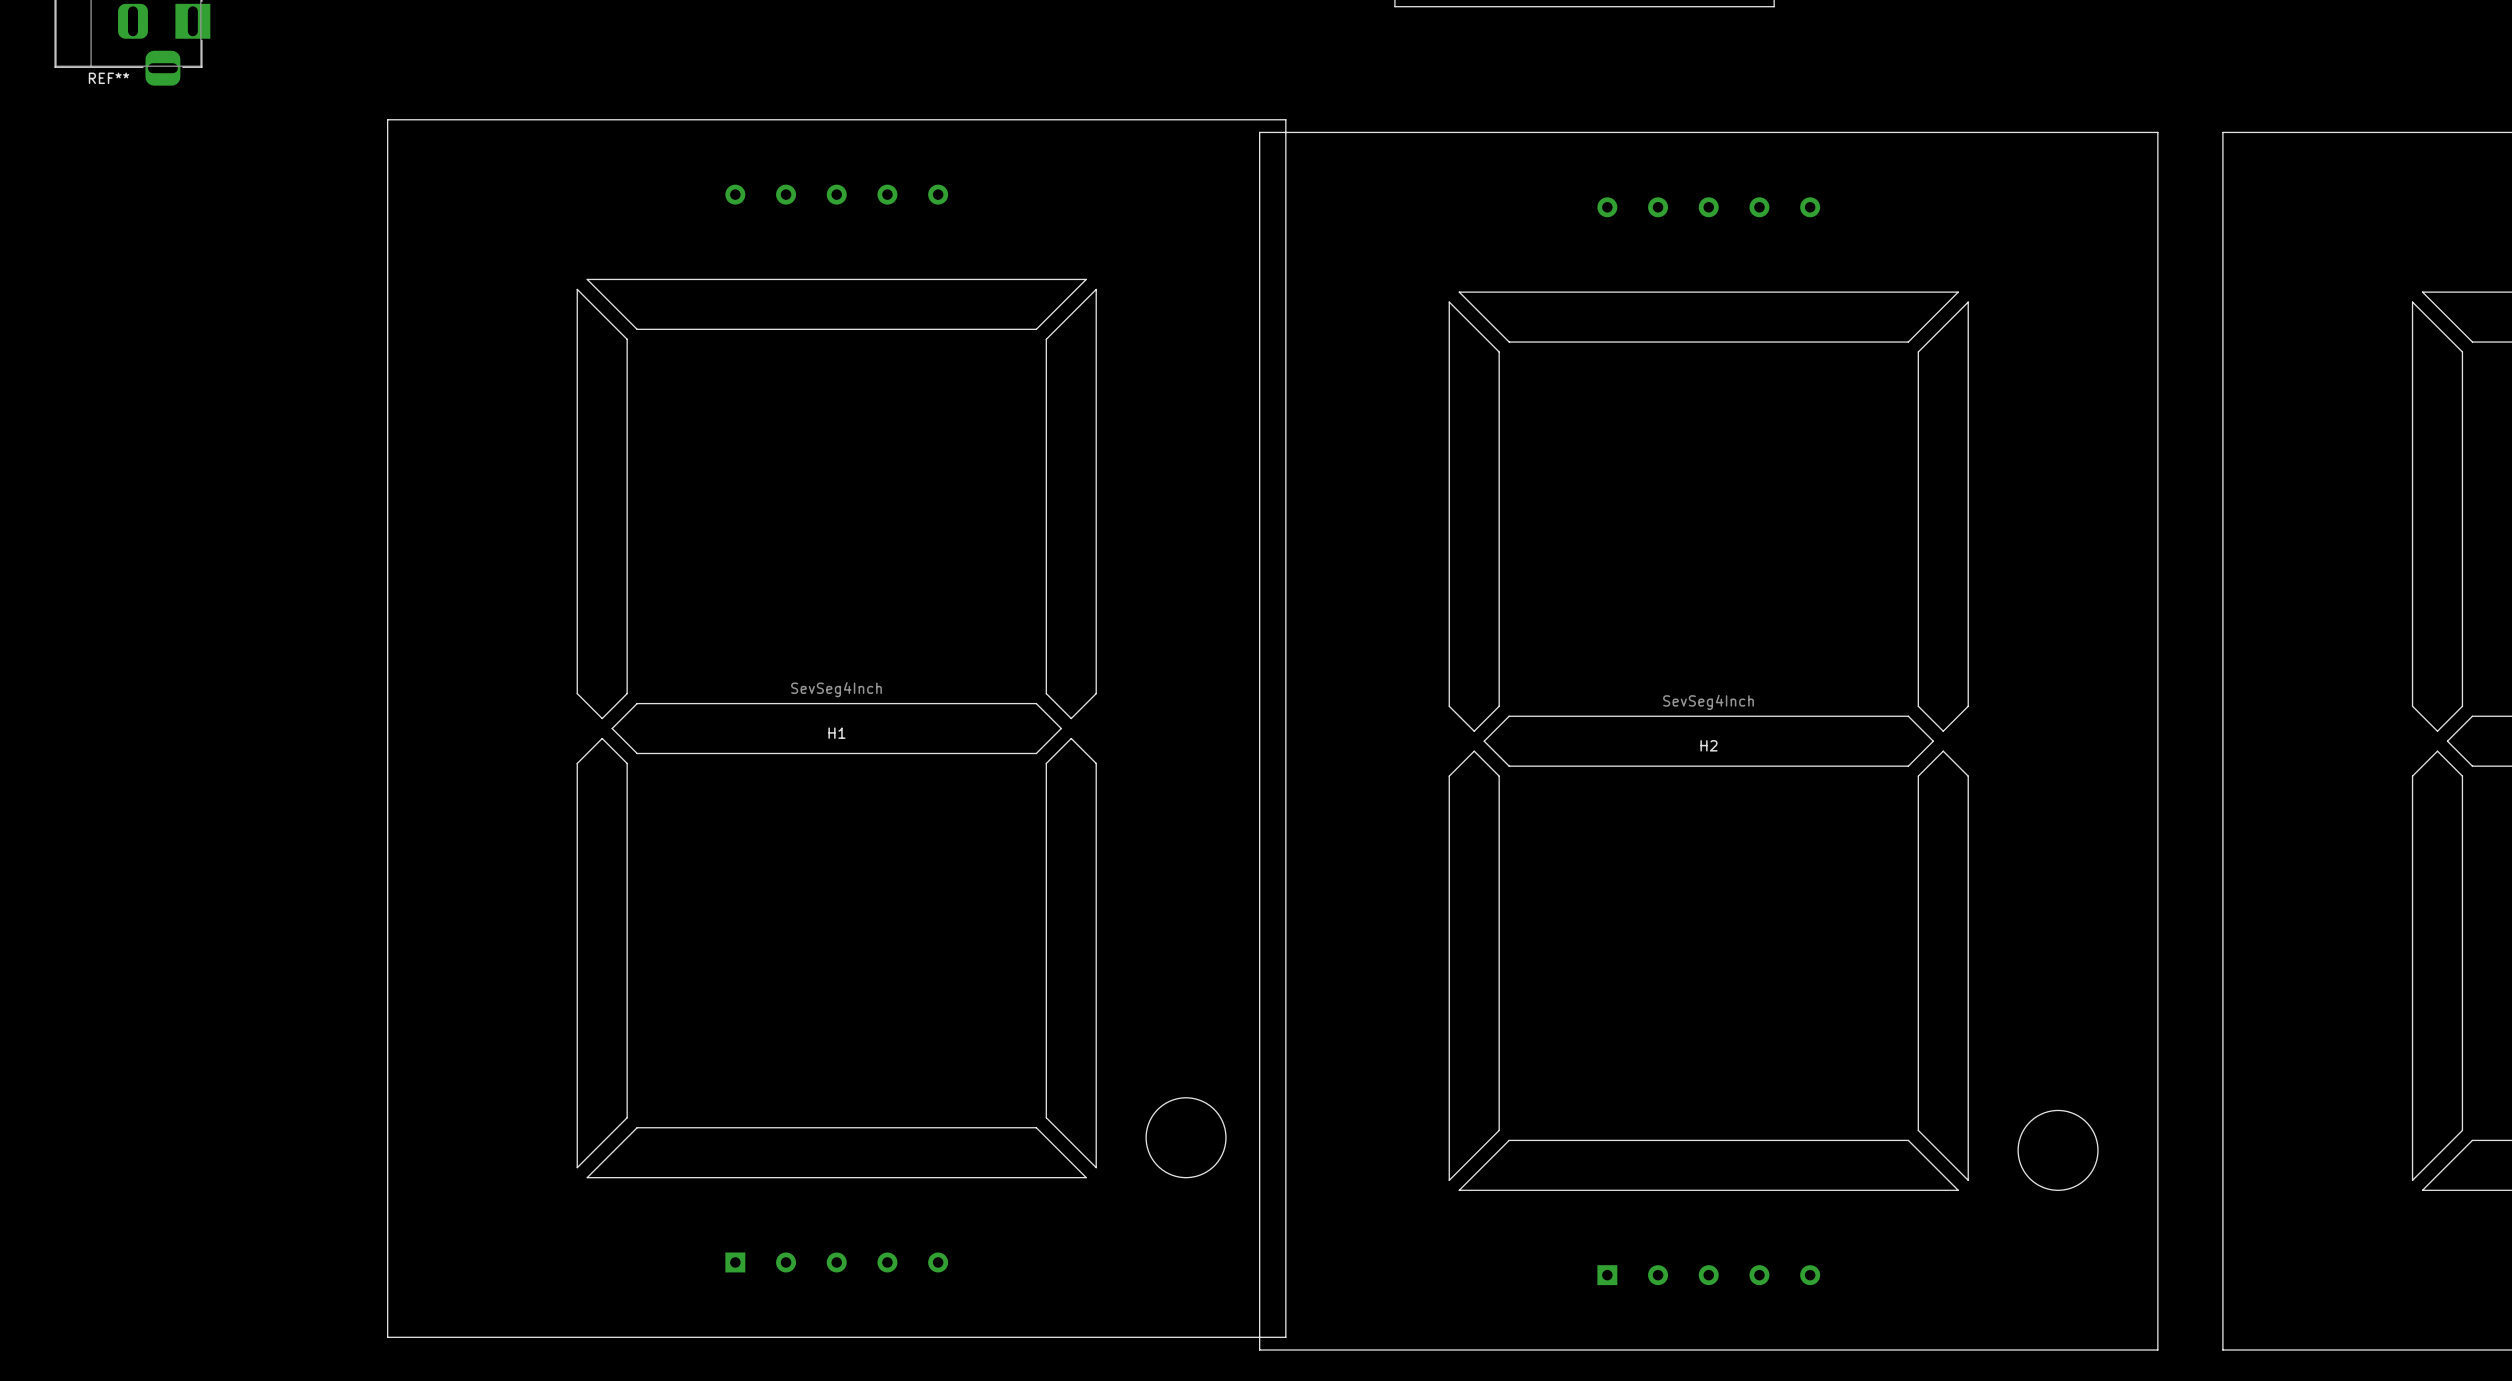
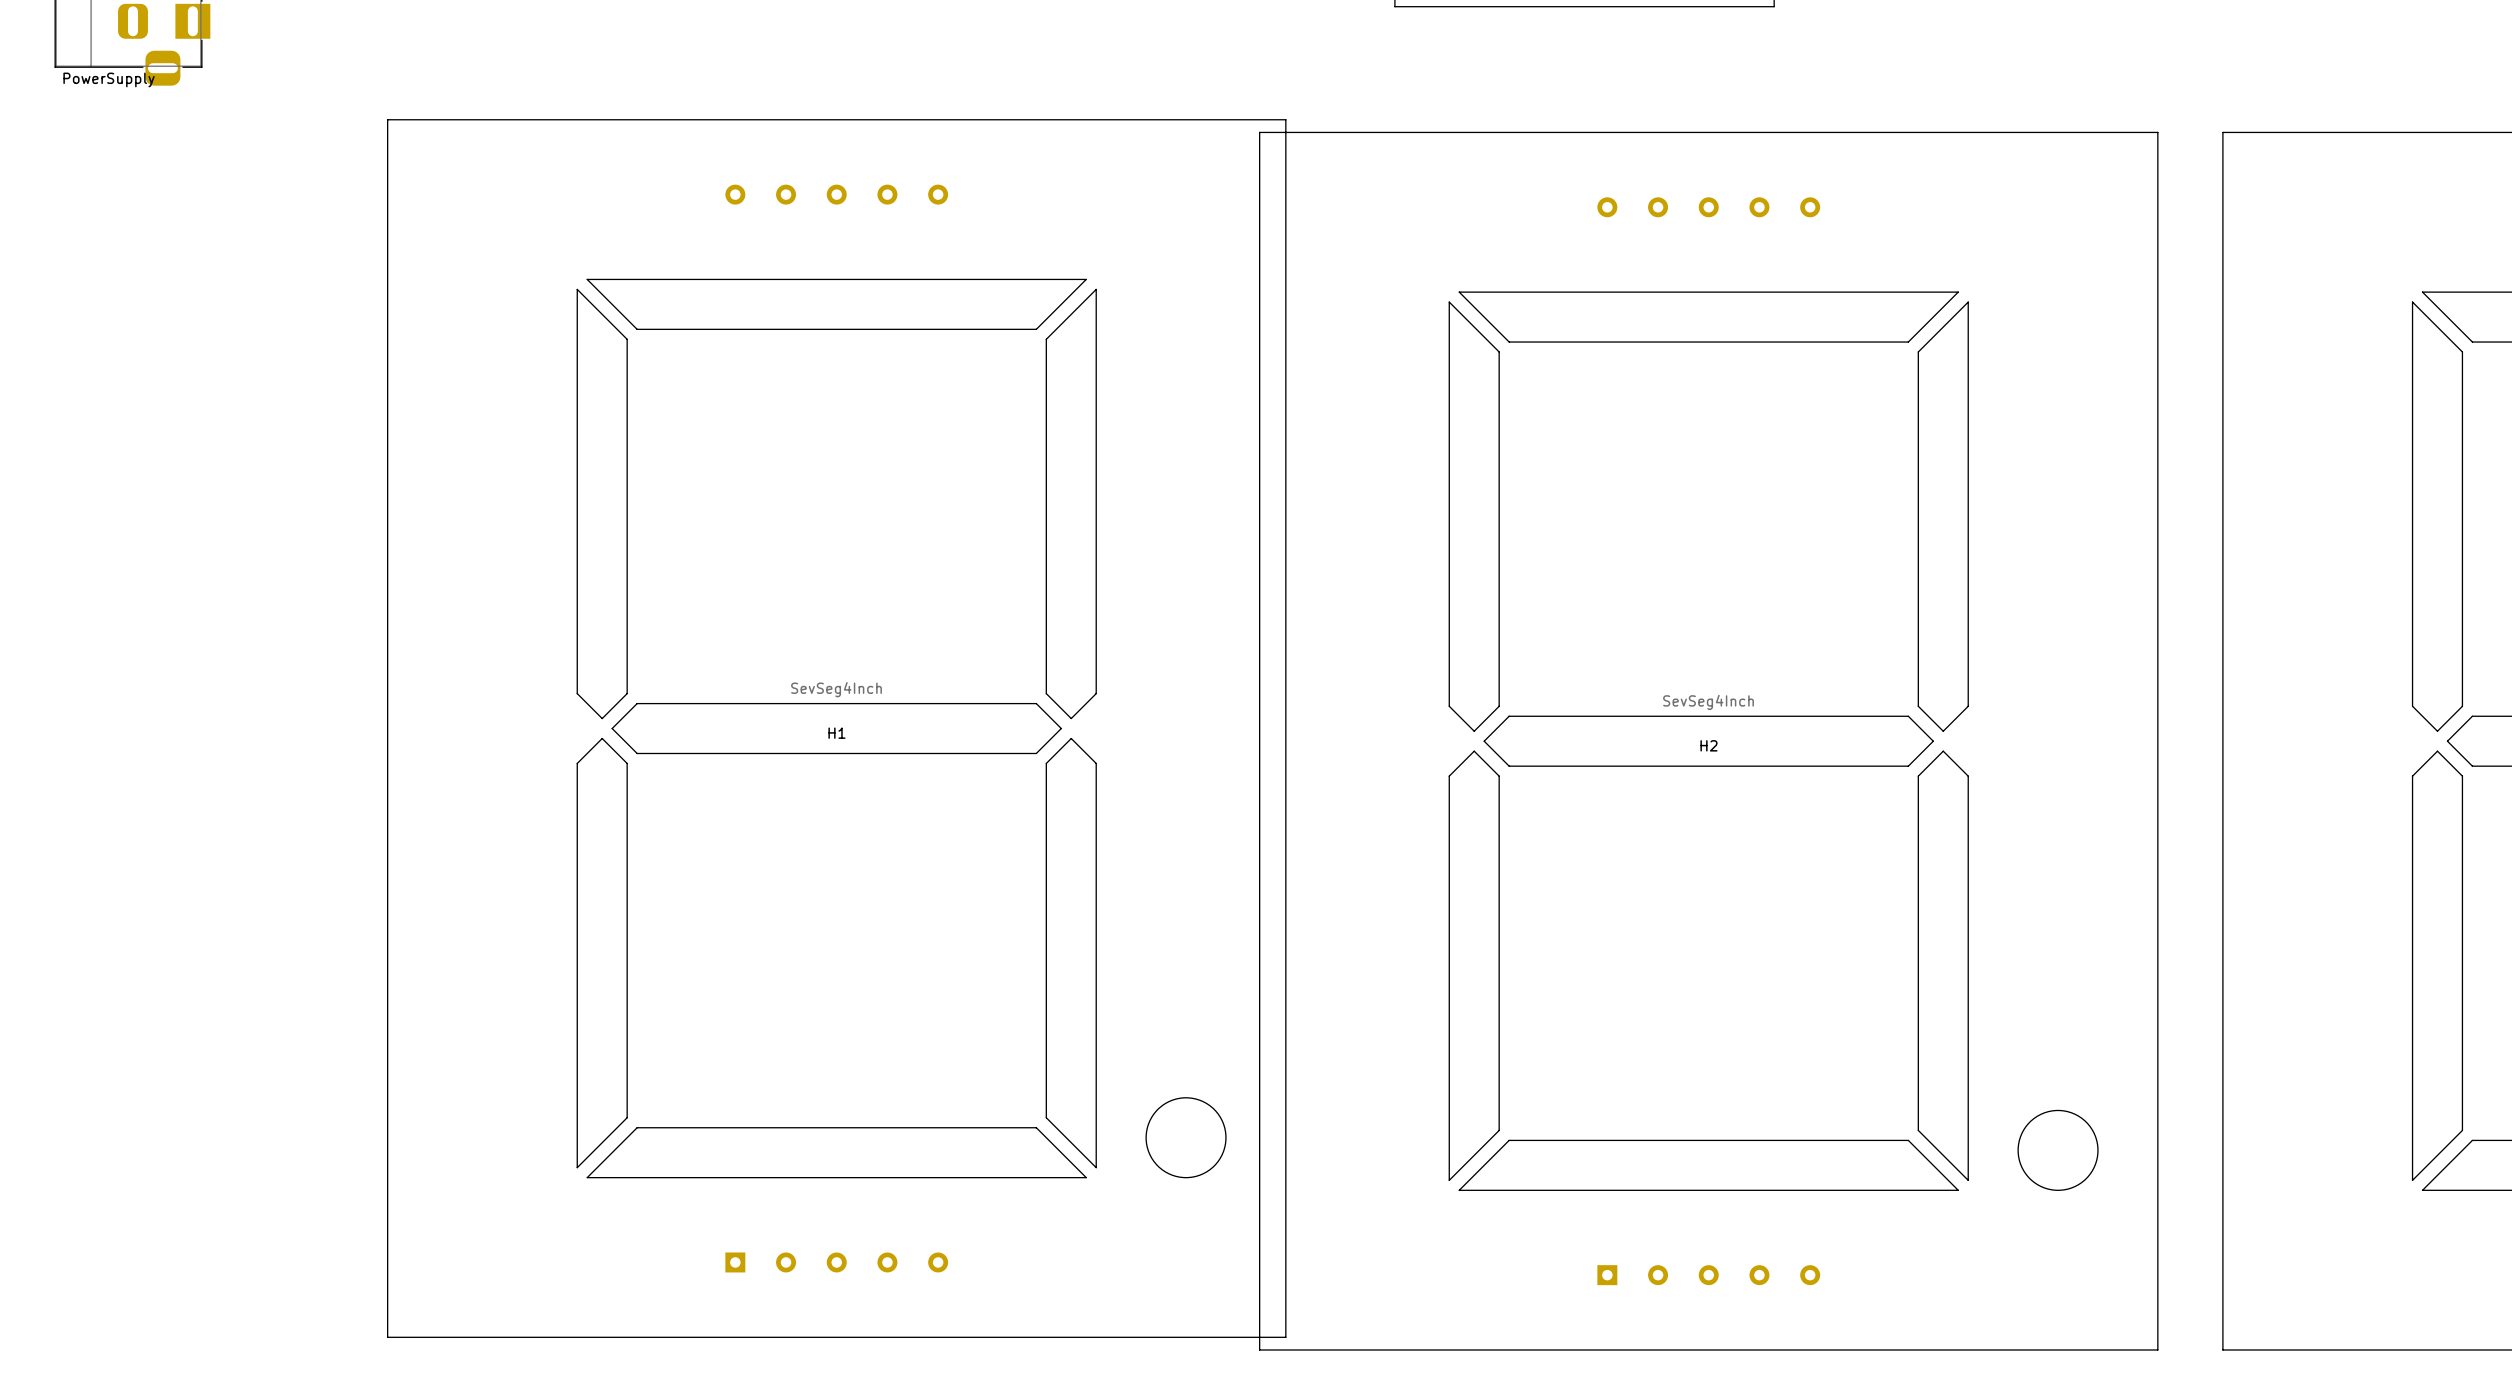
REF** name: REF** (109, 78) -> PowerSupply (109, 79)

